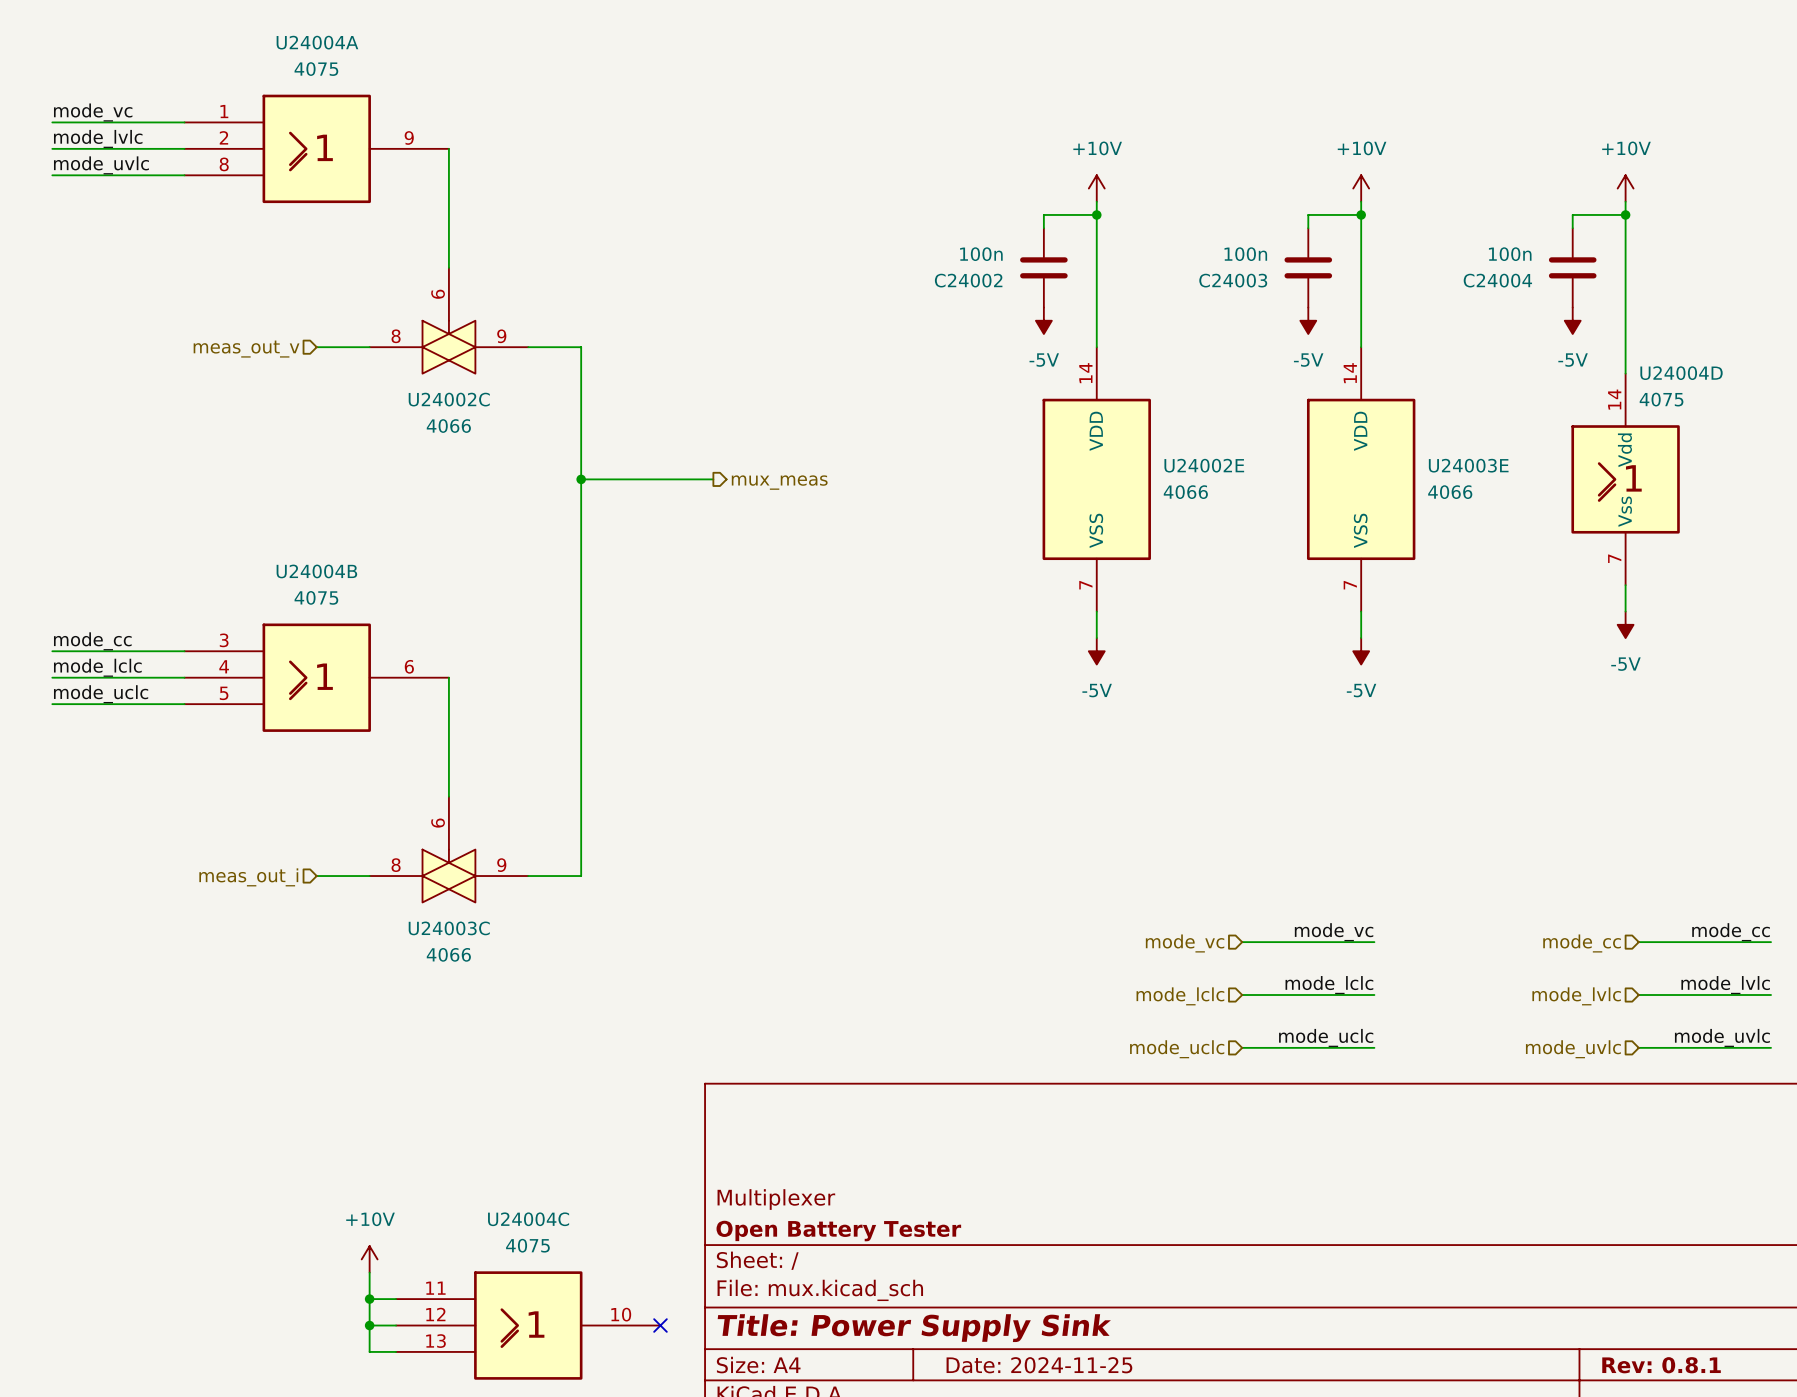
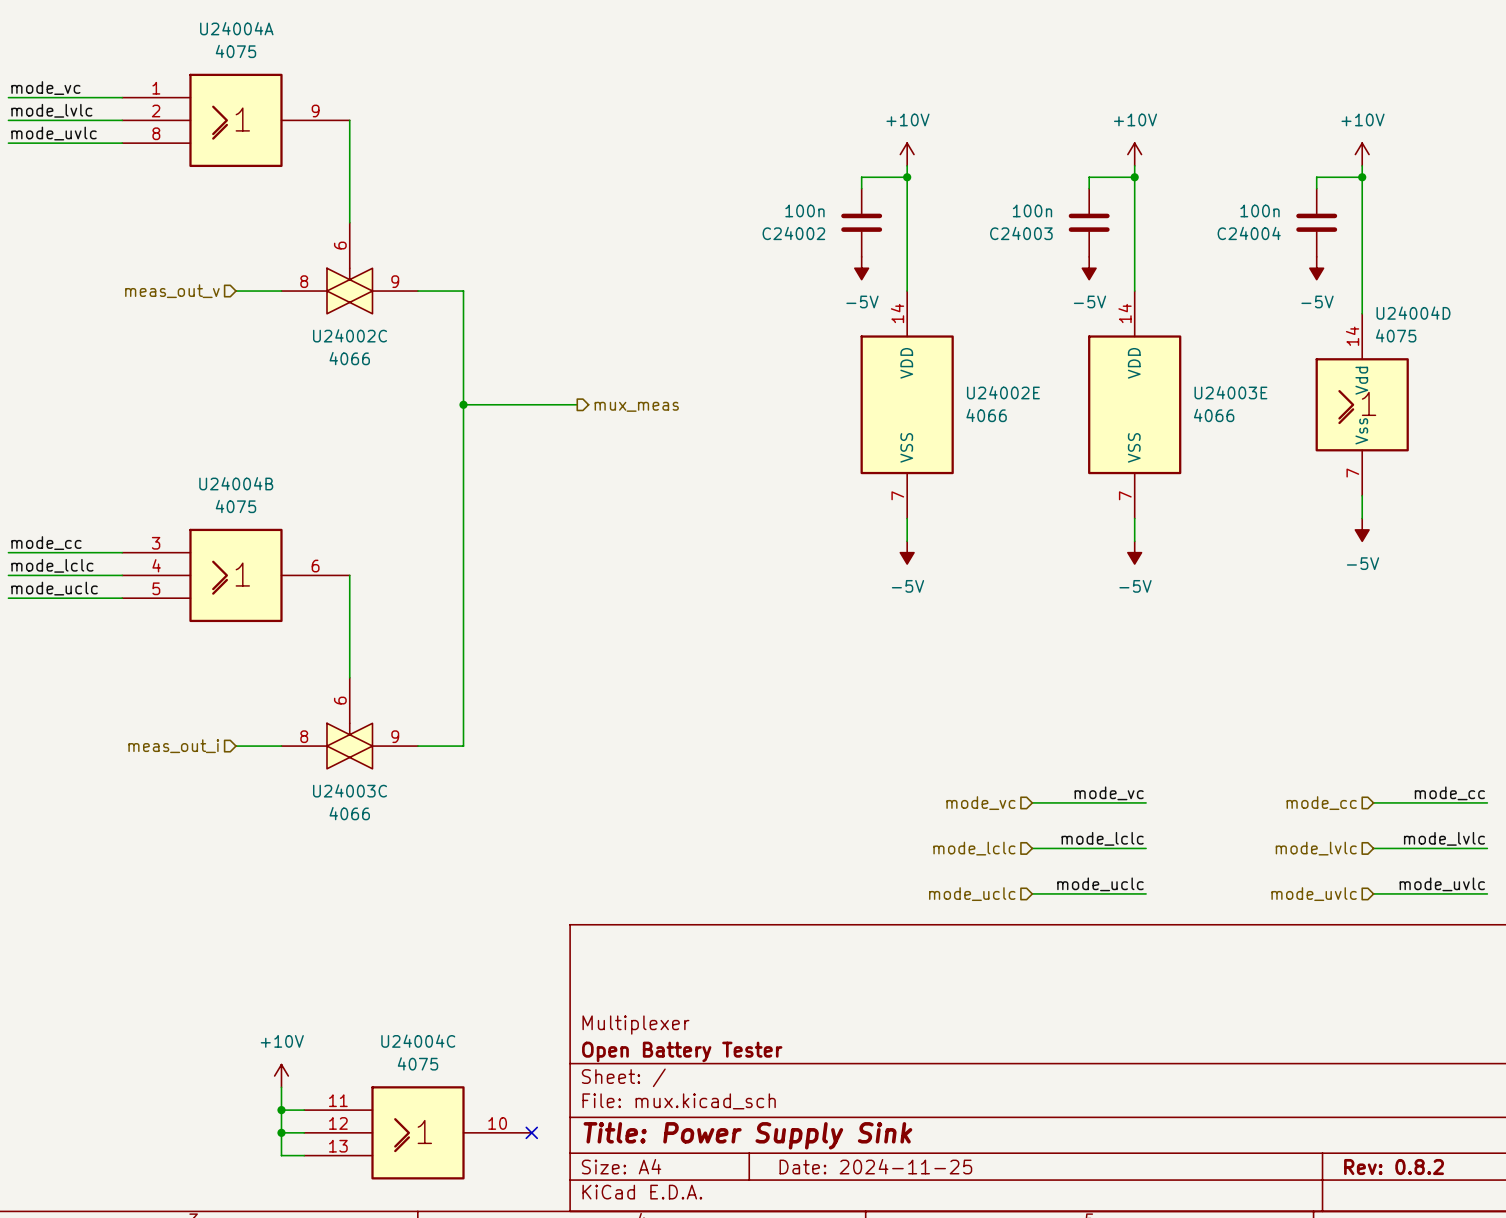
title block: Rev: 0.8.1 (1661, 1365) -> Rev: 0.8.2 (1394, 1167)

